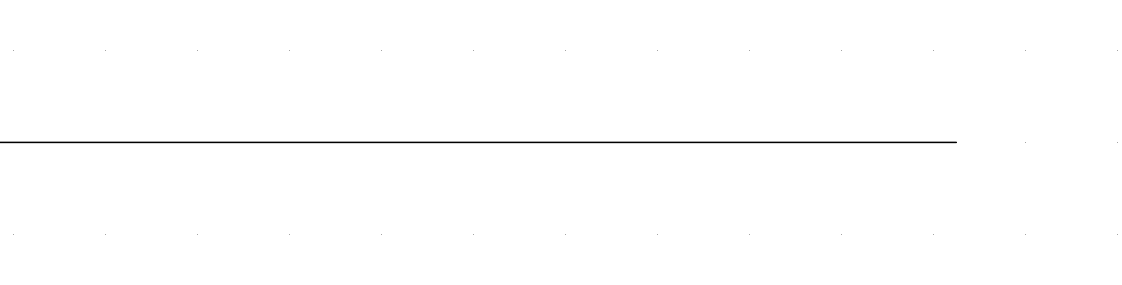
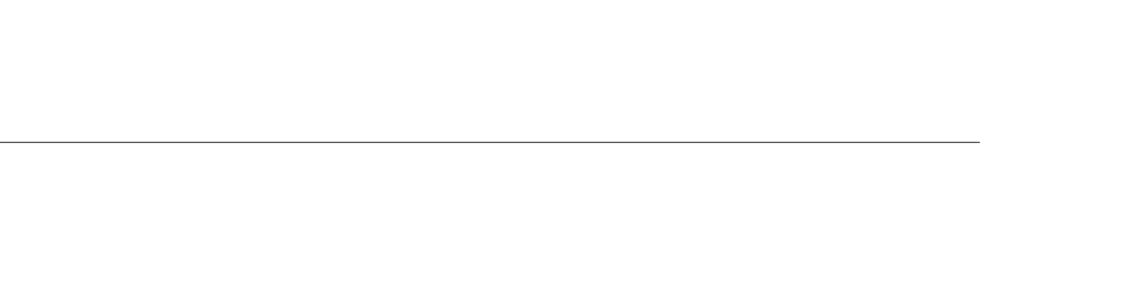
line: none -> (956, 142) (979, 142)

